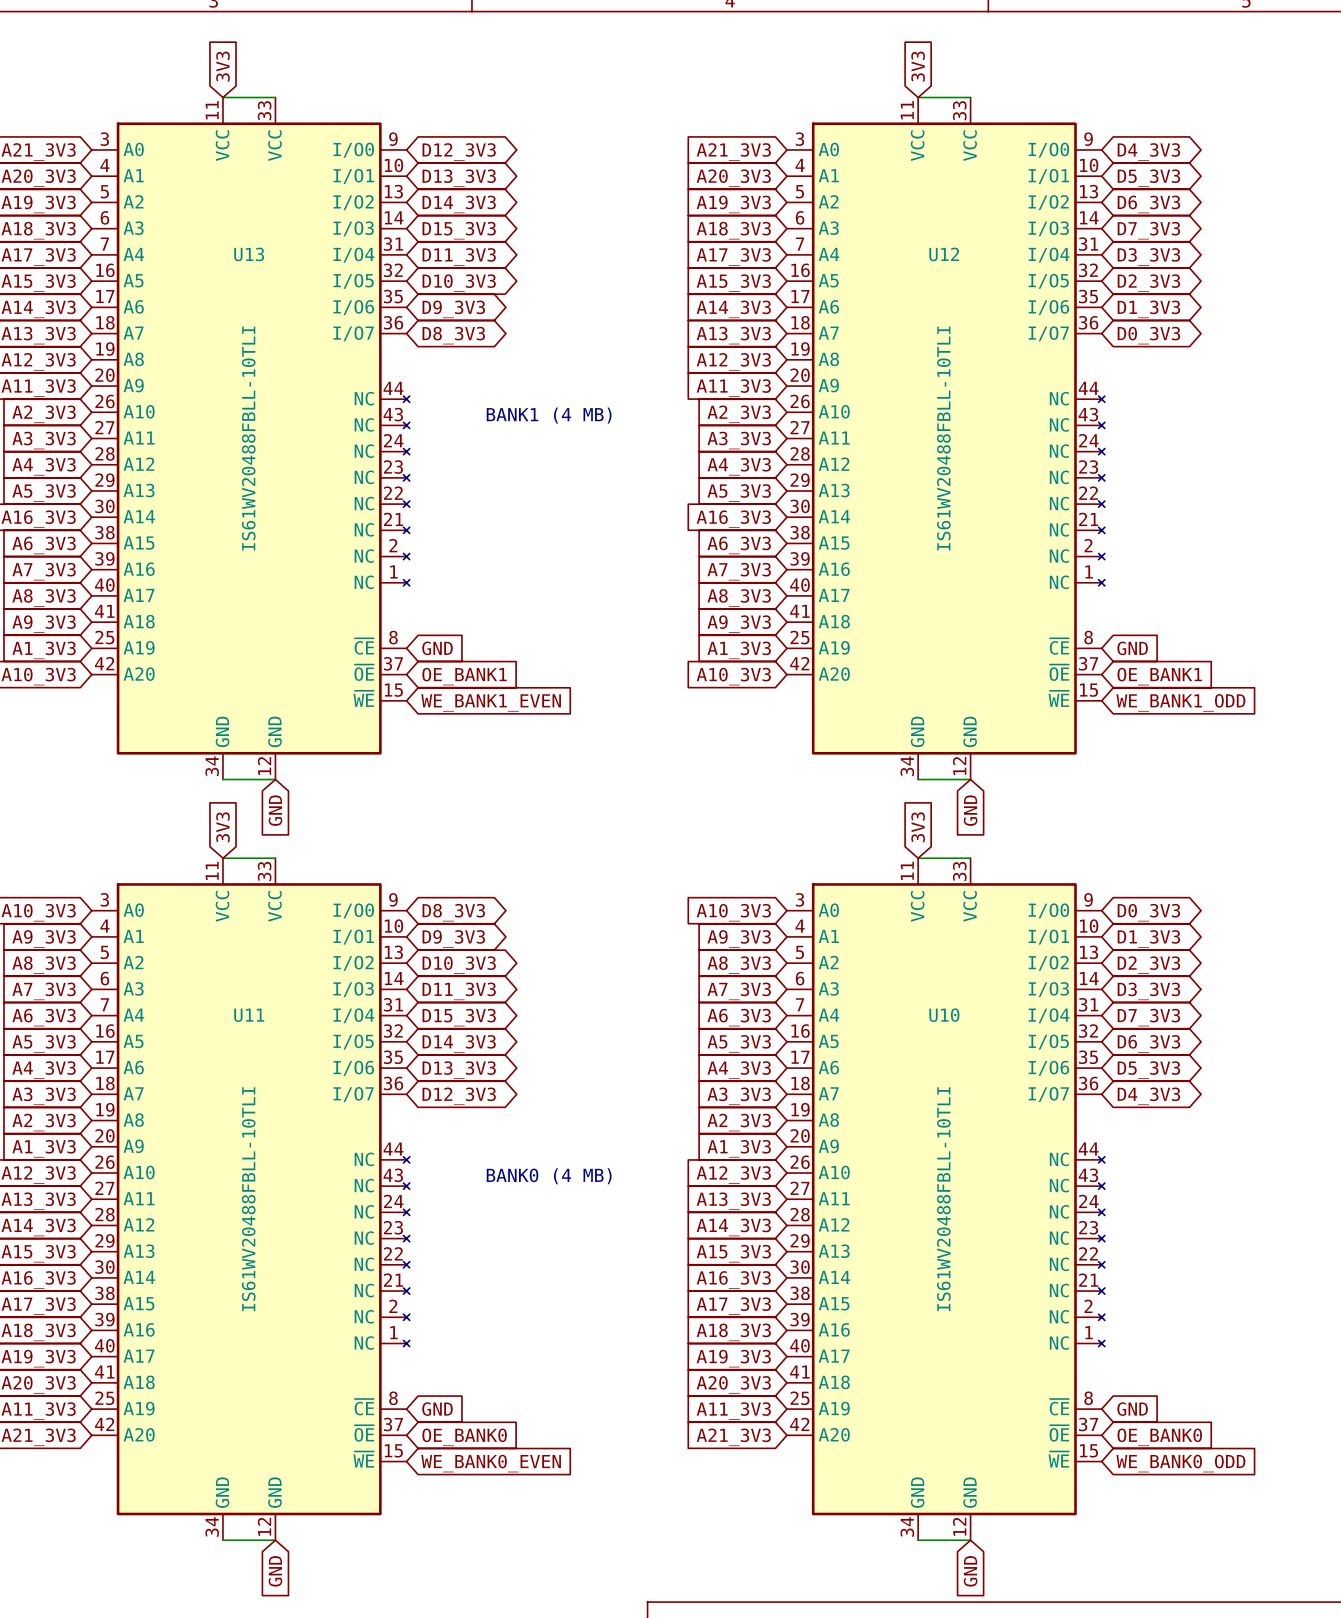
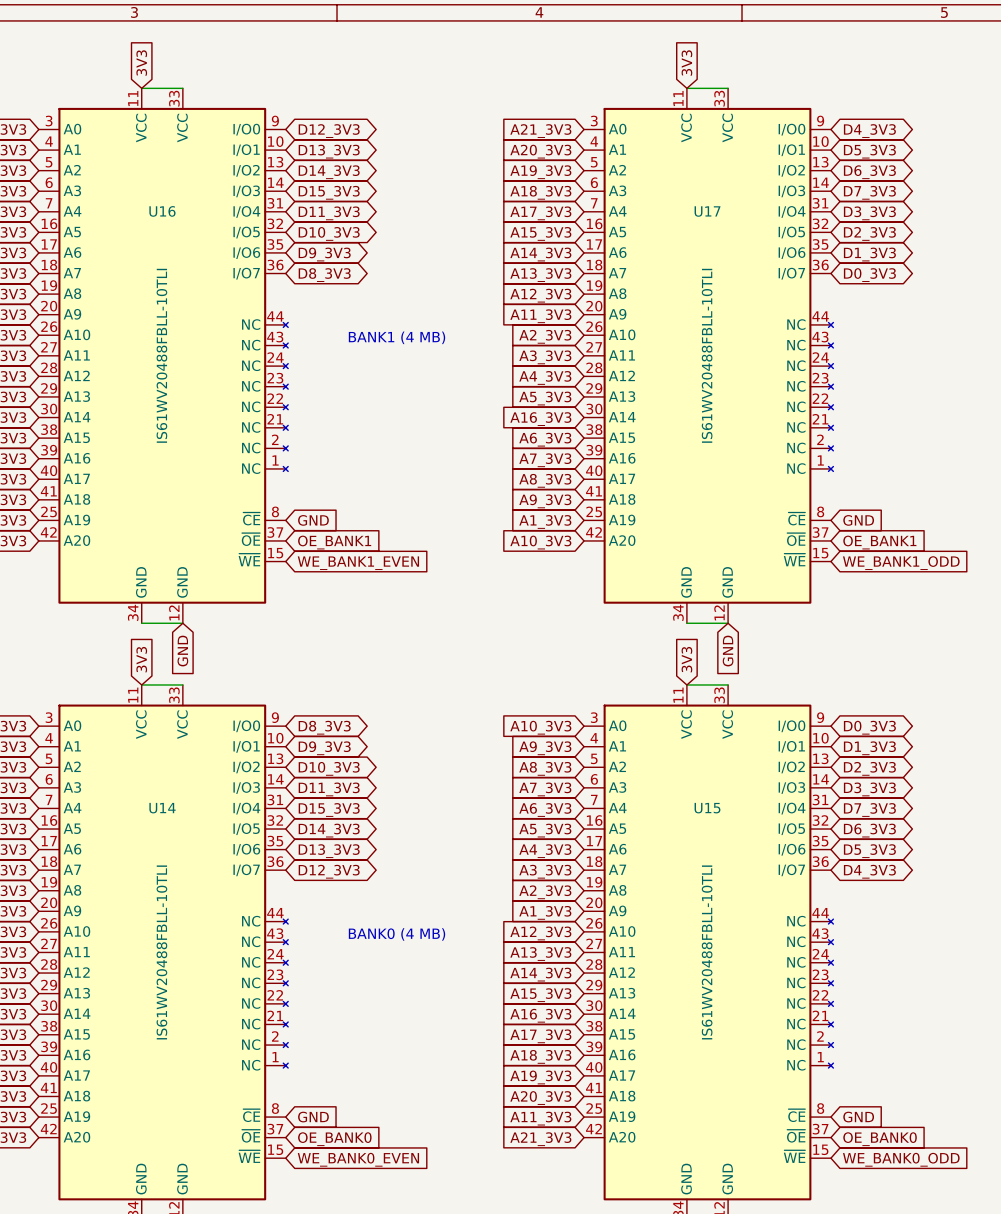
U13 name: U13 (249, 254) -> U16 (162, 211)
U12 name: U12 (944, 254) -> U17 (707, 211)
U11 name: U11 (249, 1015) -> U14 (162, 808)
U10 name: U10 (944, 1015) -> U15 (707, 808)

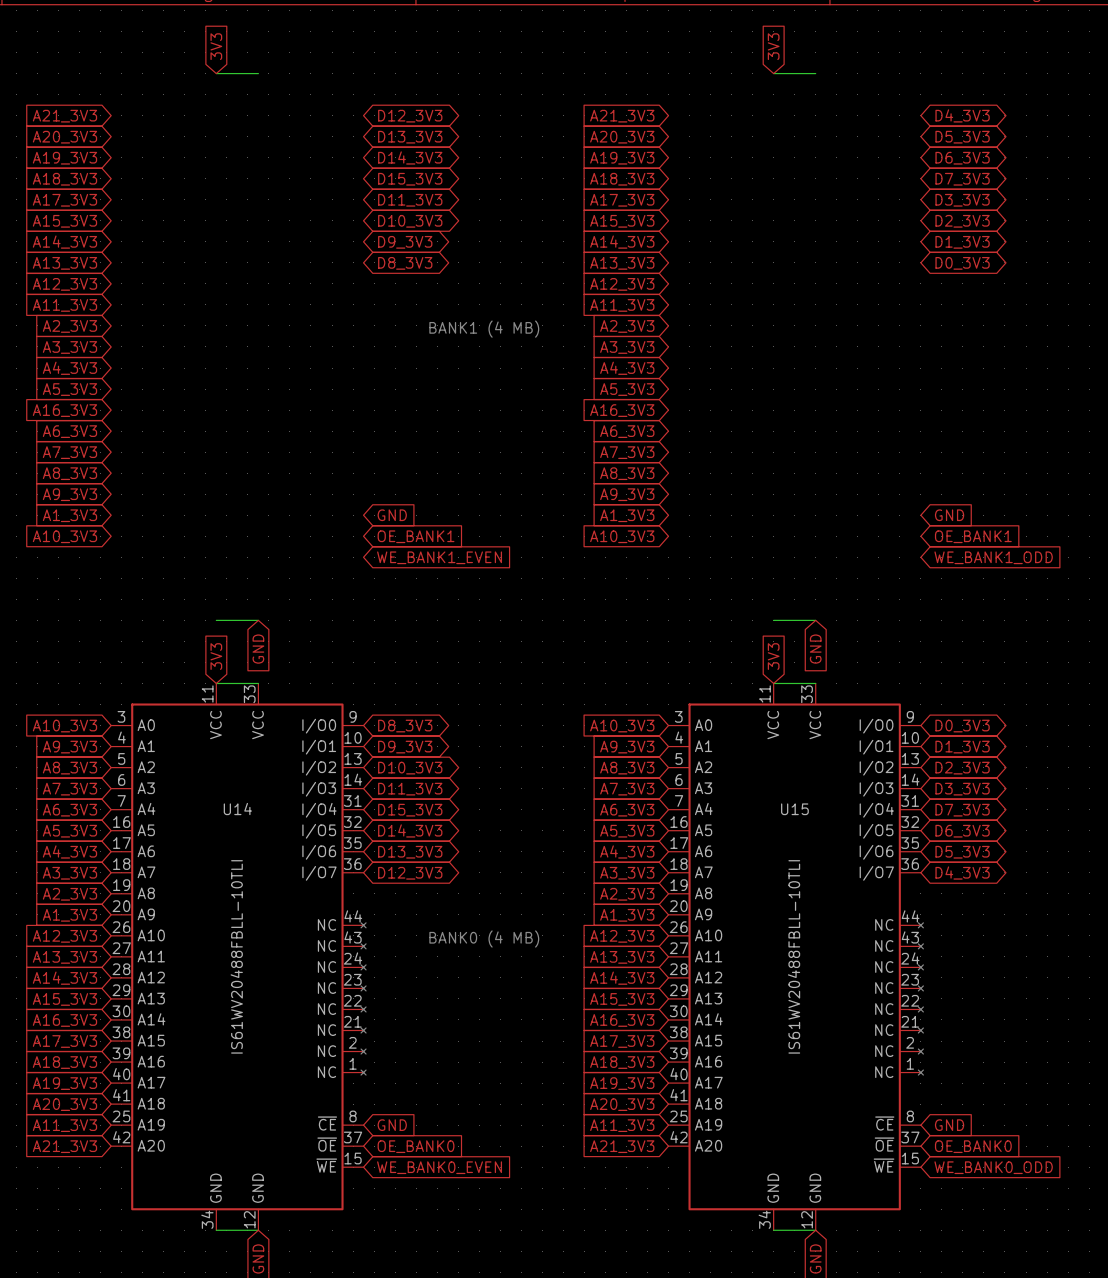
U16: IS61WV20488FBLL-10TLI (163, 355) -> none
U17: IS61WV20488FBLL-10TLI (708, 355) -> none

